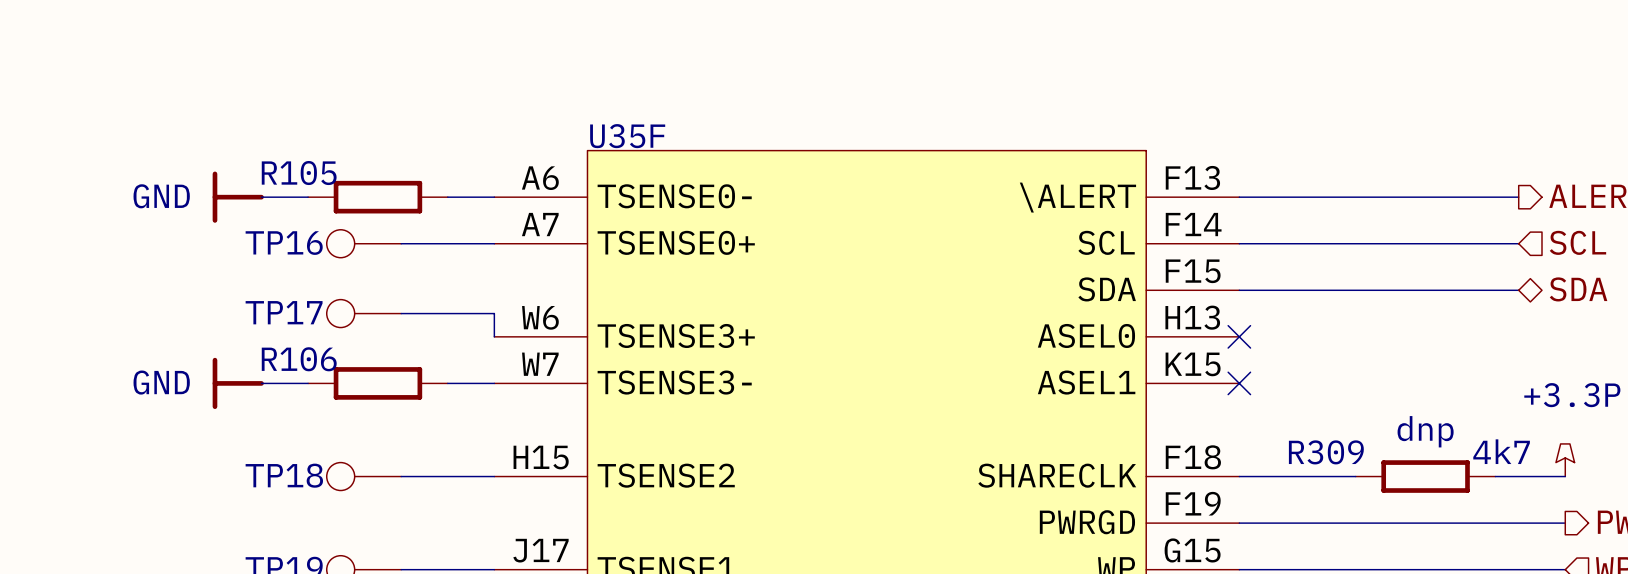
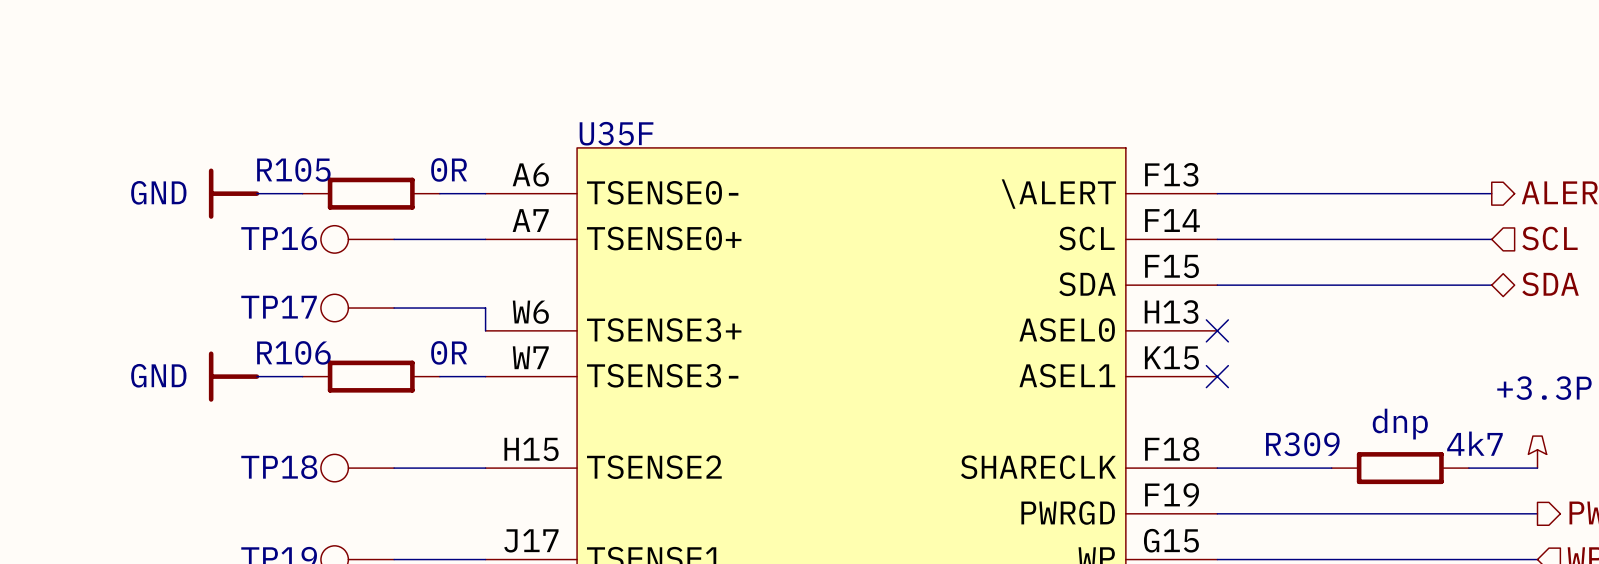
R105 value: none -> 0R (449, 169)
R106 value: none -> 0R (449, 352)

